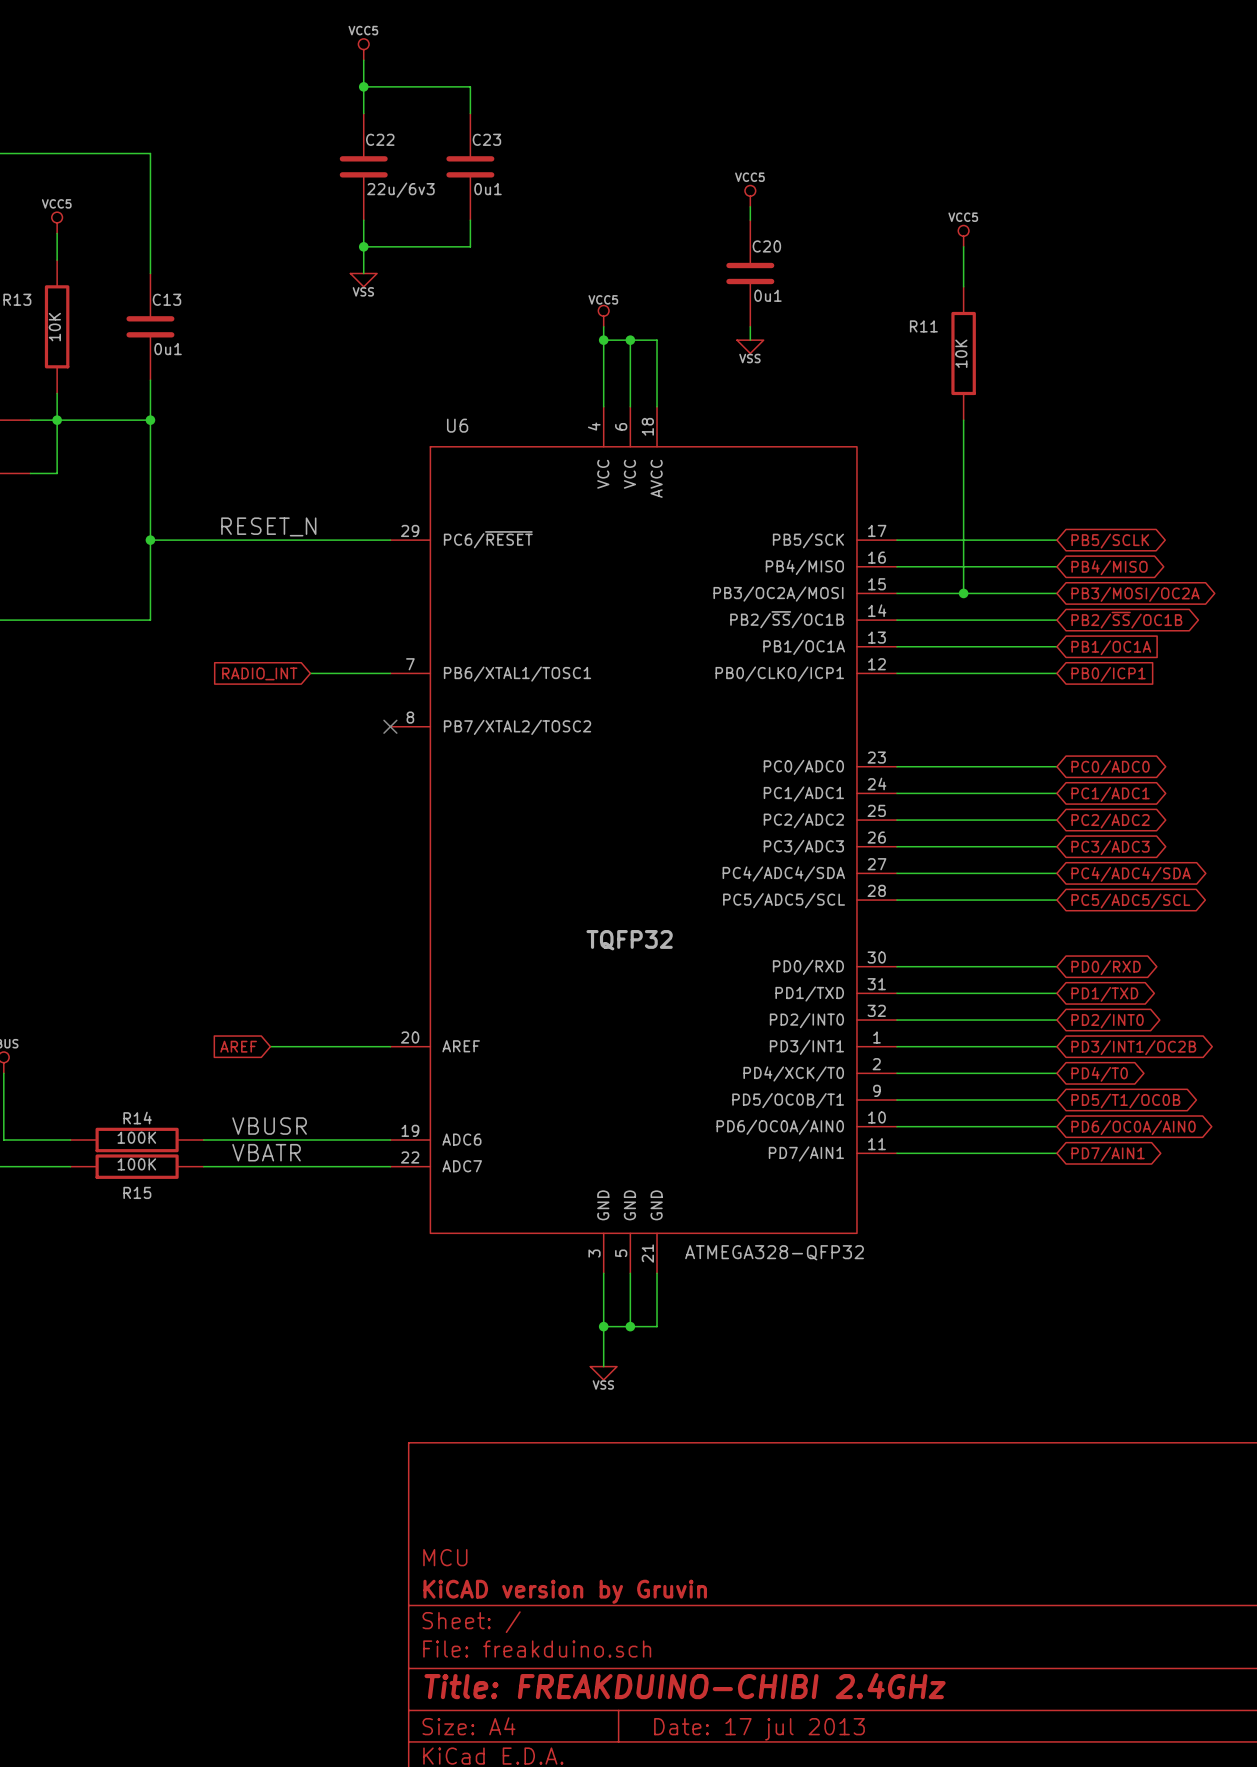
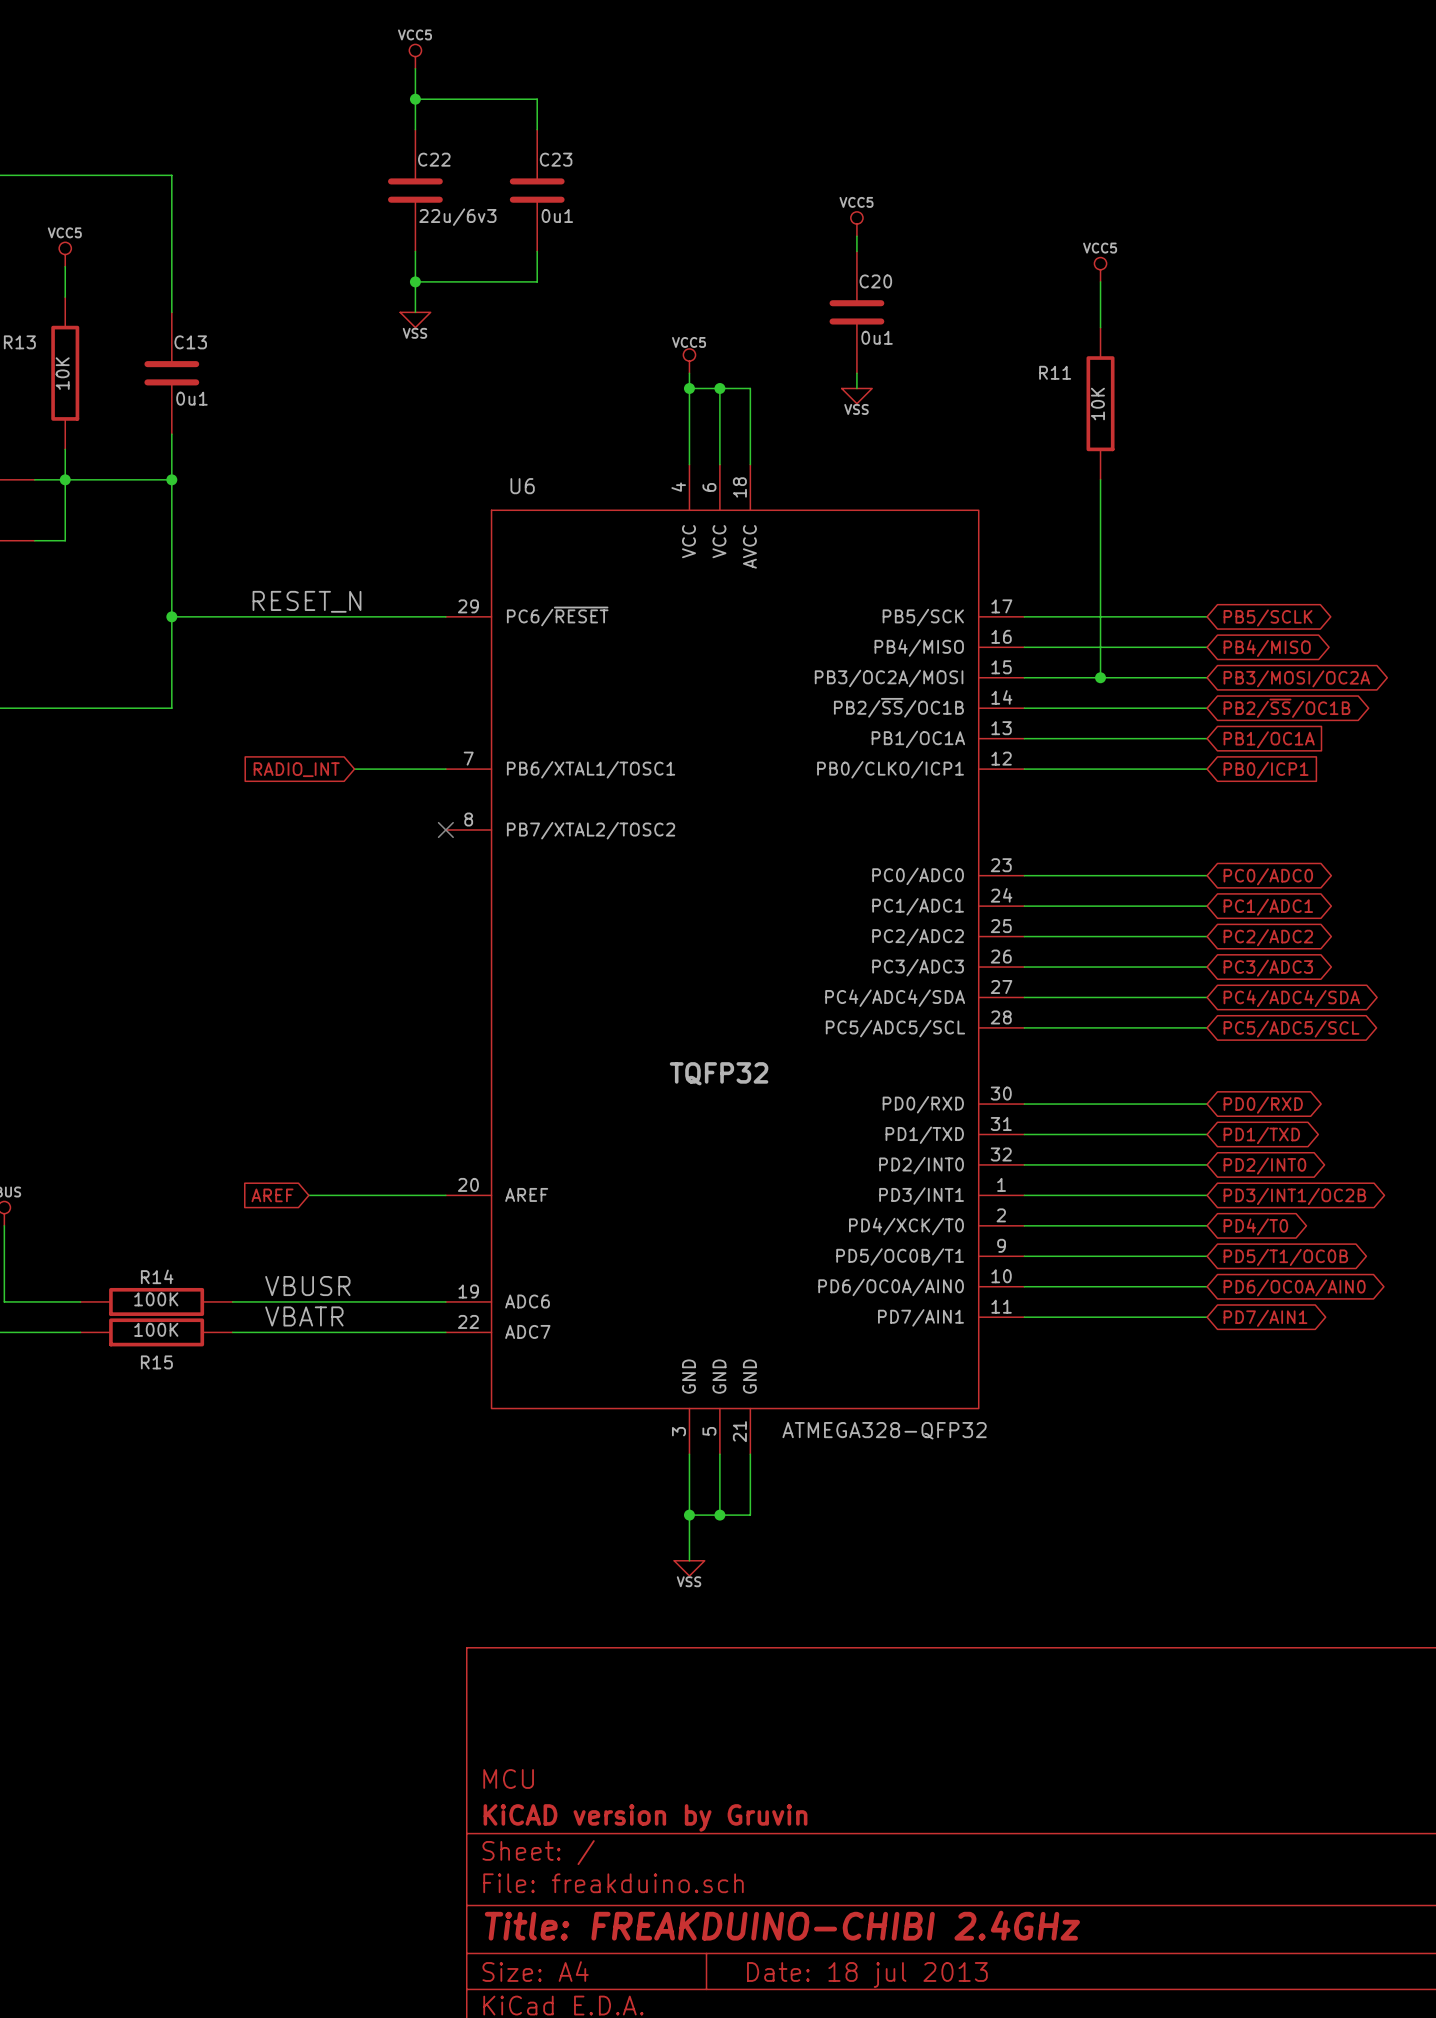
title block: Date: 17 jul 2013 (759, 1729) -> Date: 18 jul 2013 (867, 1974)

